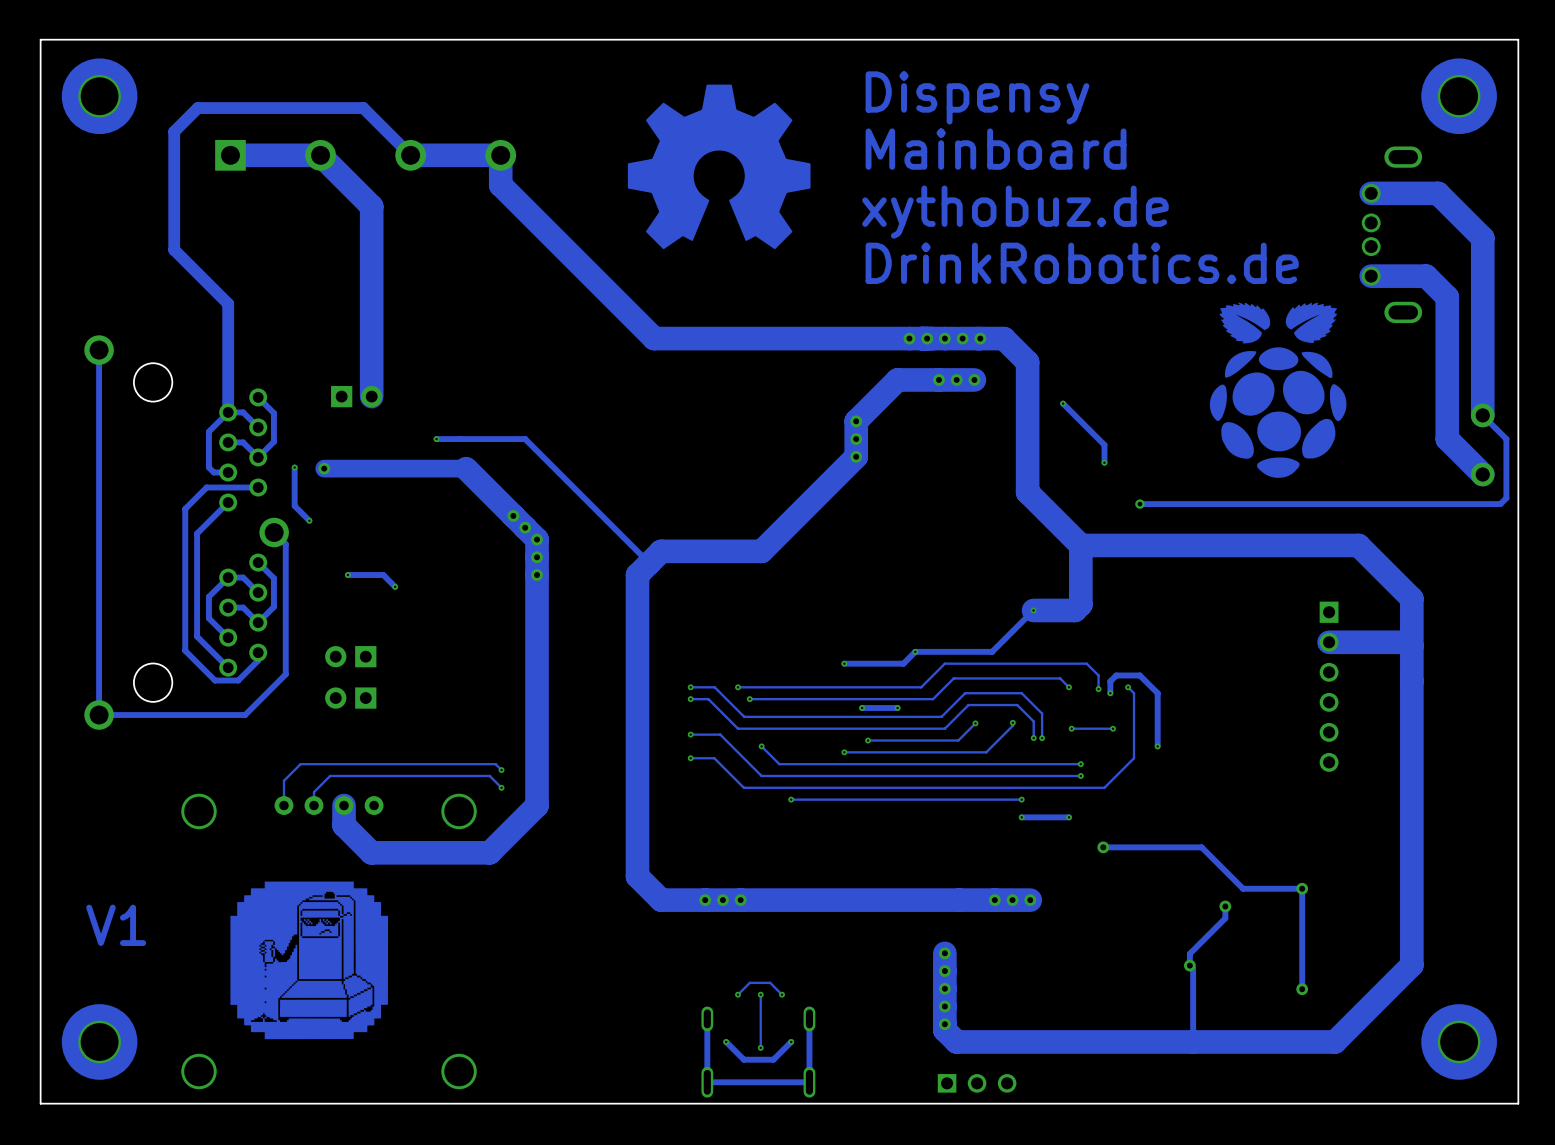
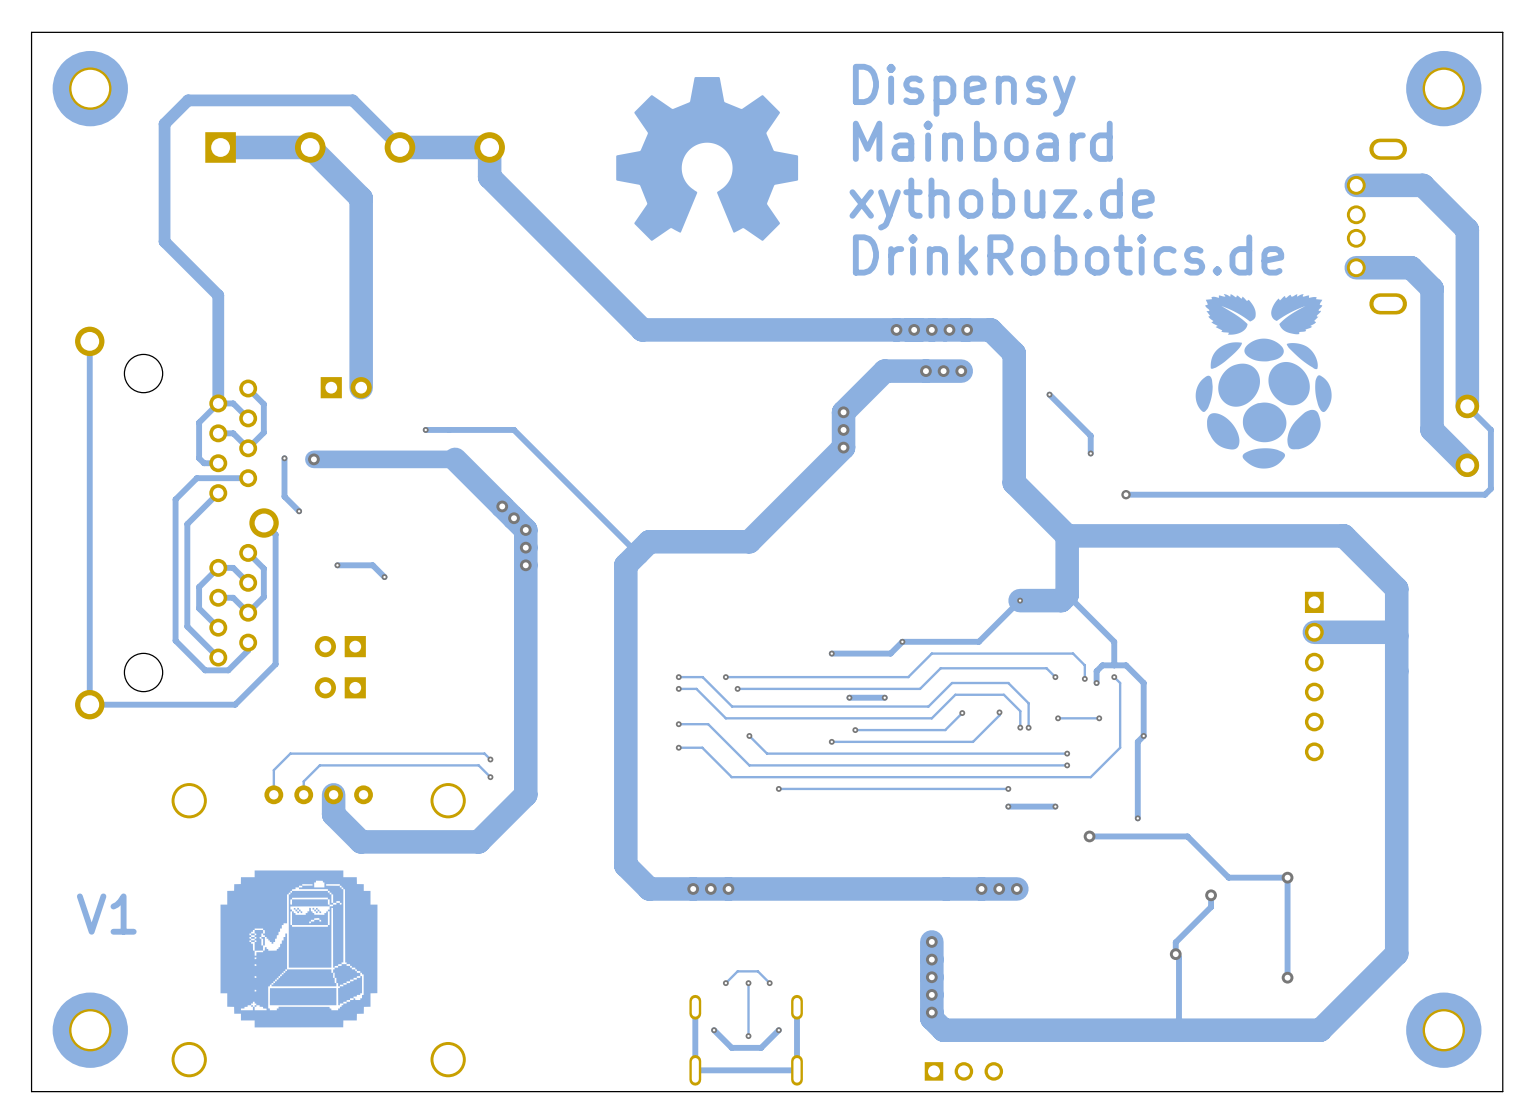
track: none -> (1067, 594) (1114, 641) (1114, 665)
track: none -> (1143, 735) (1137, 741) (1137, 818)
via: none -> (1137, 818)

